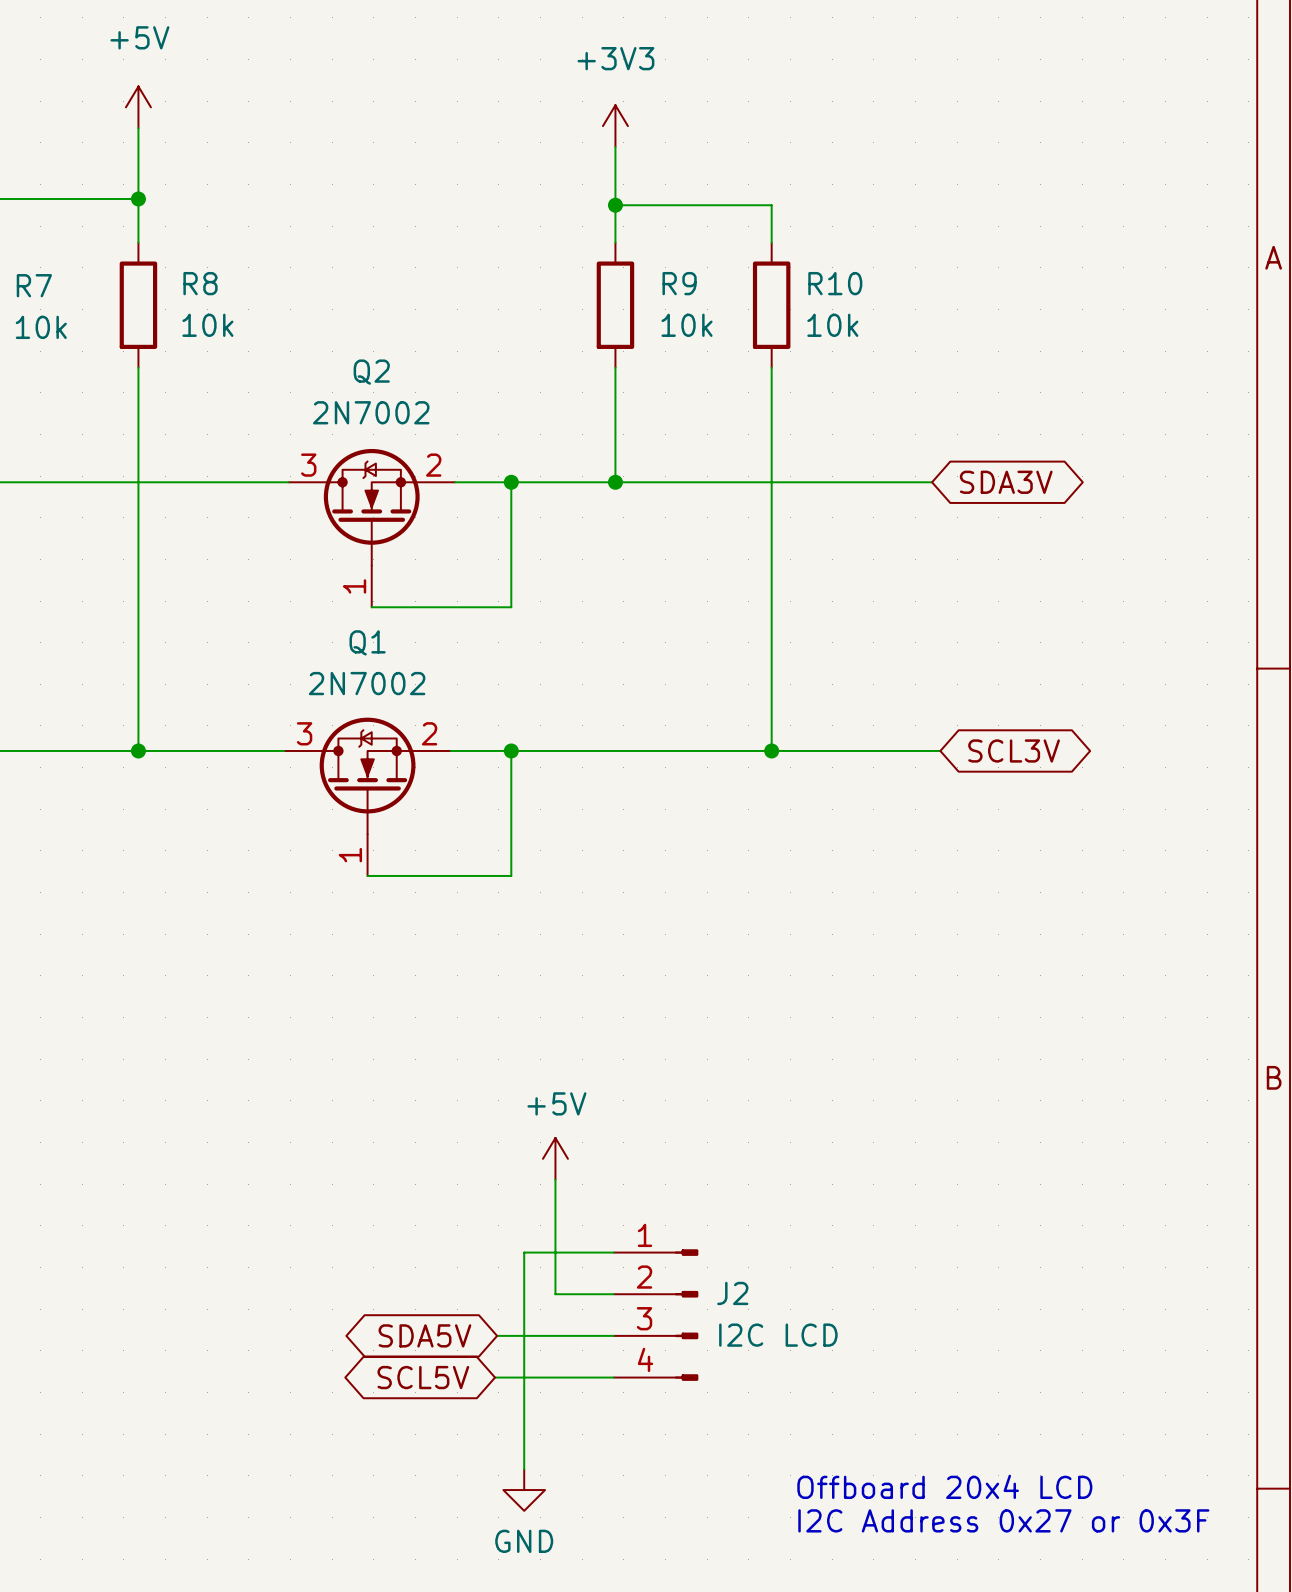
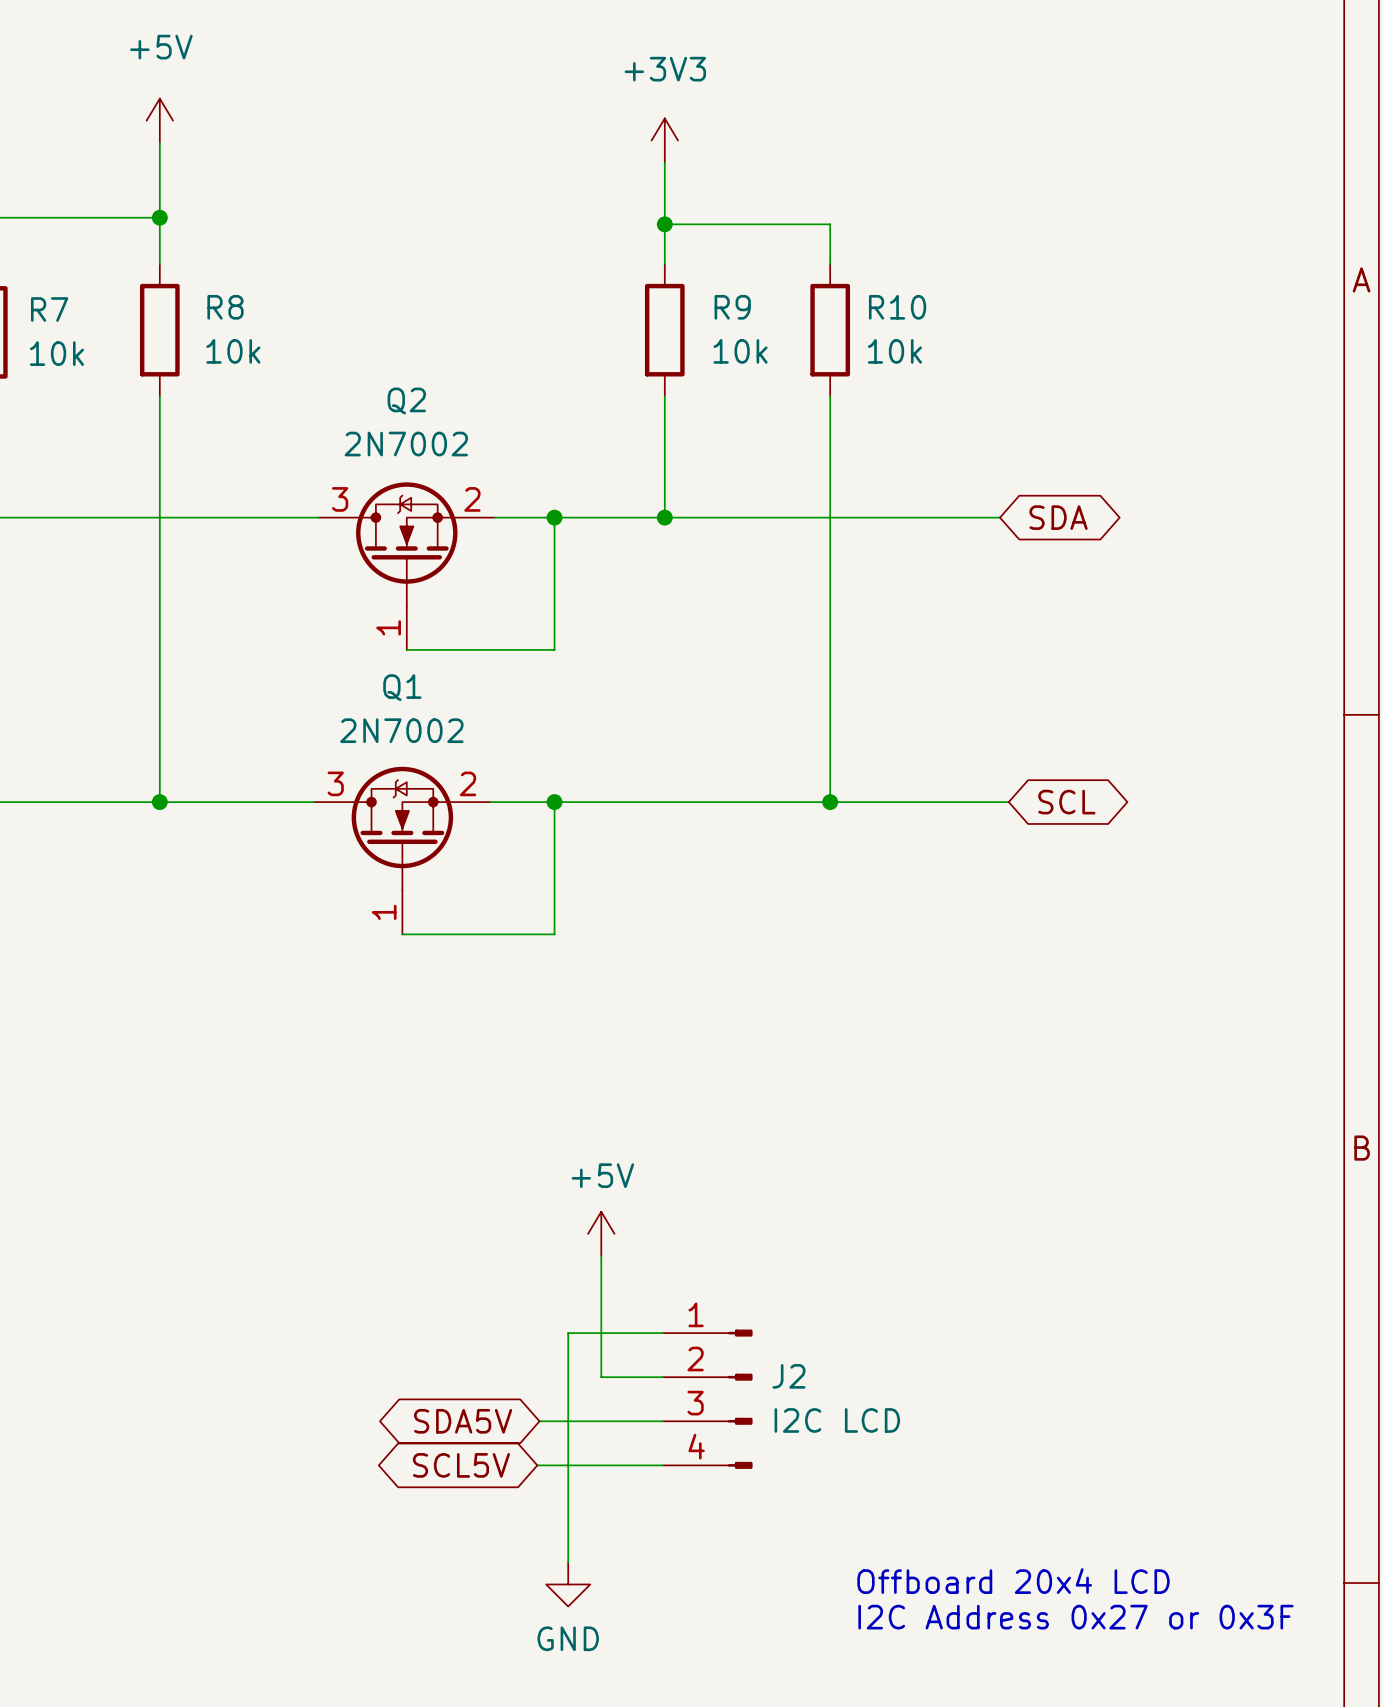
global label: SDA3V (1006, 482) -> SDA (1058, 517)
global label: SCL3V (1014, 750) -> SCL (1066, 802)

